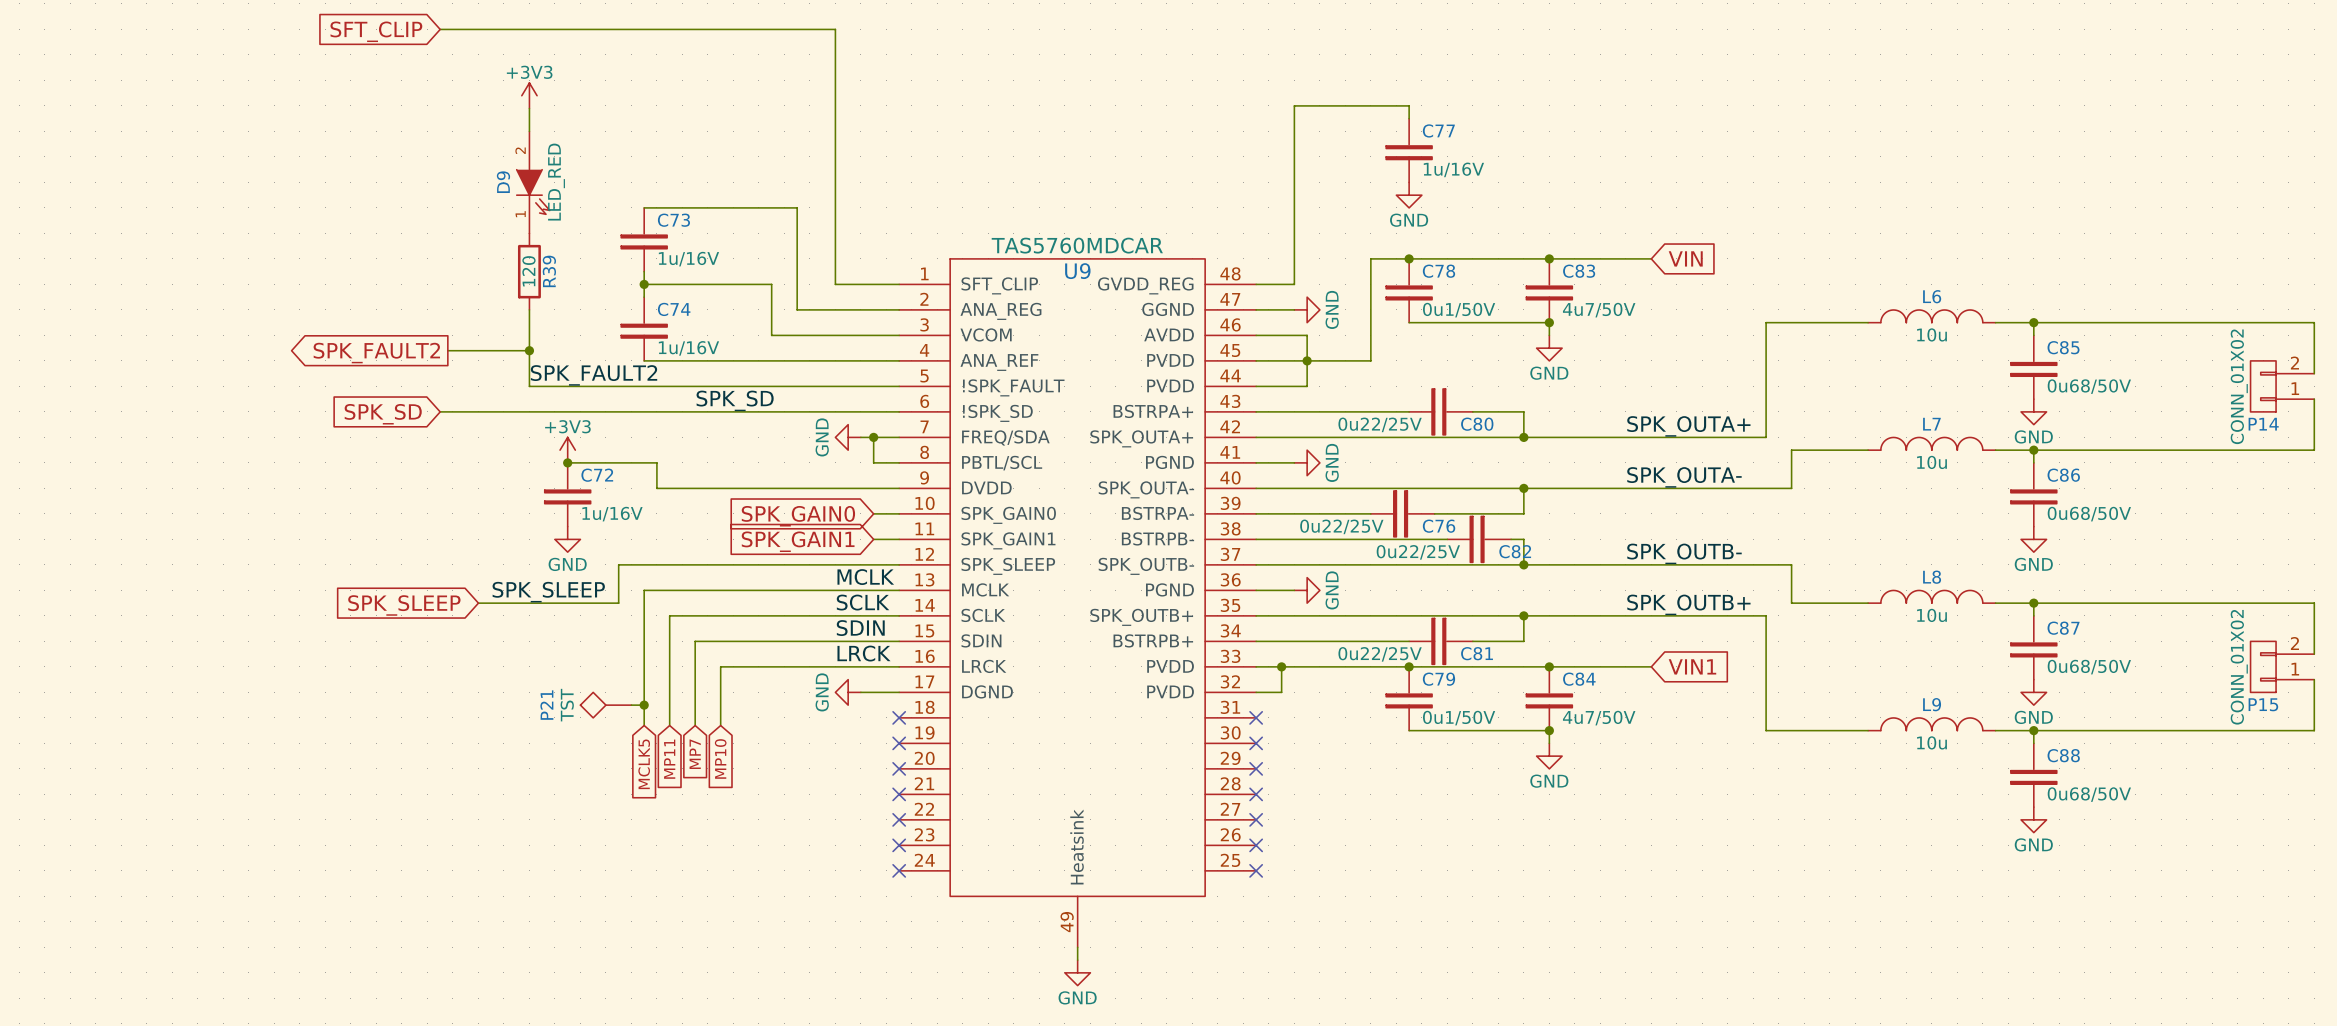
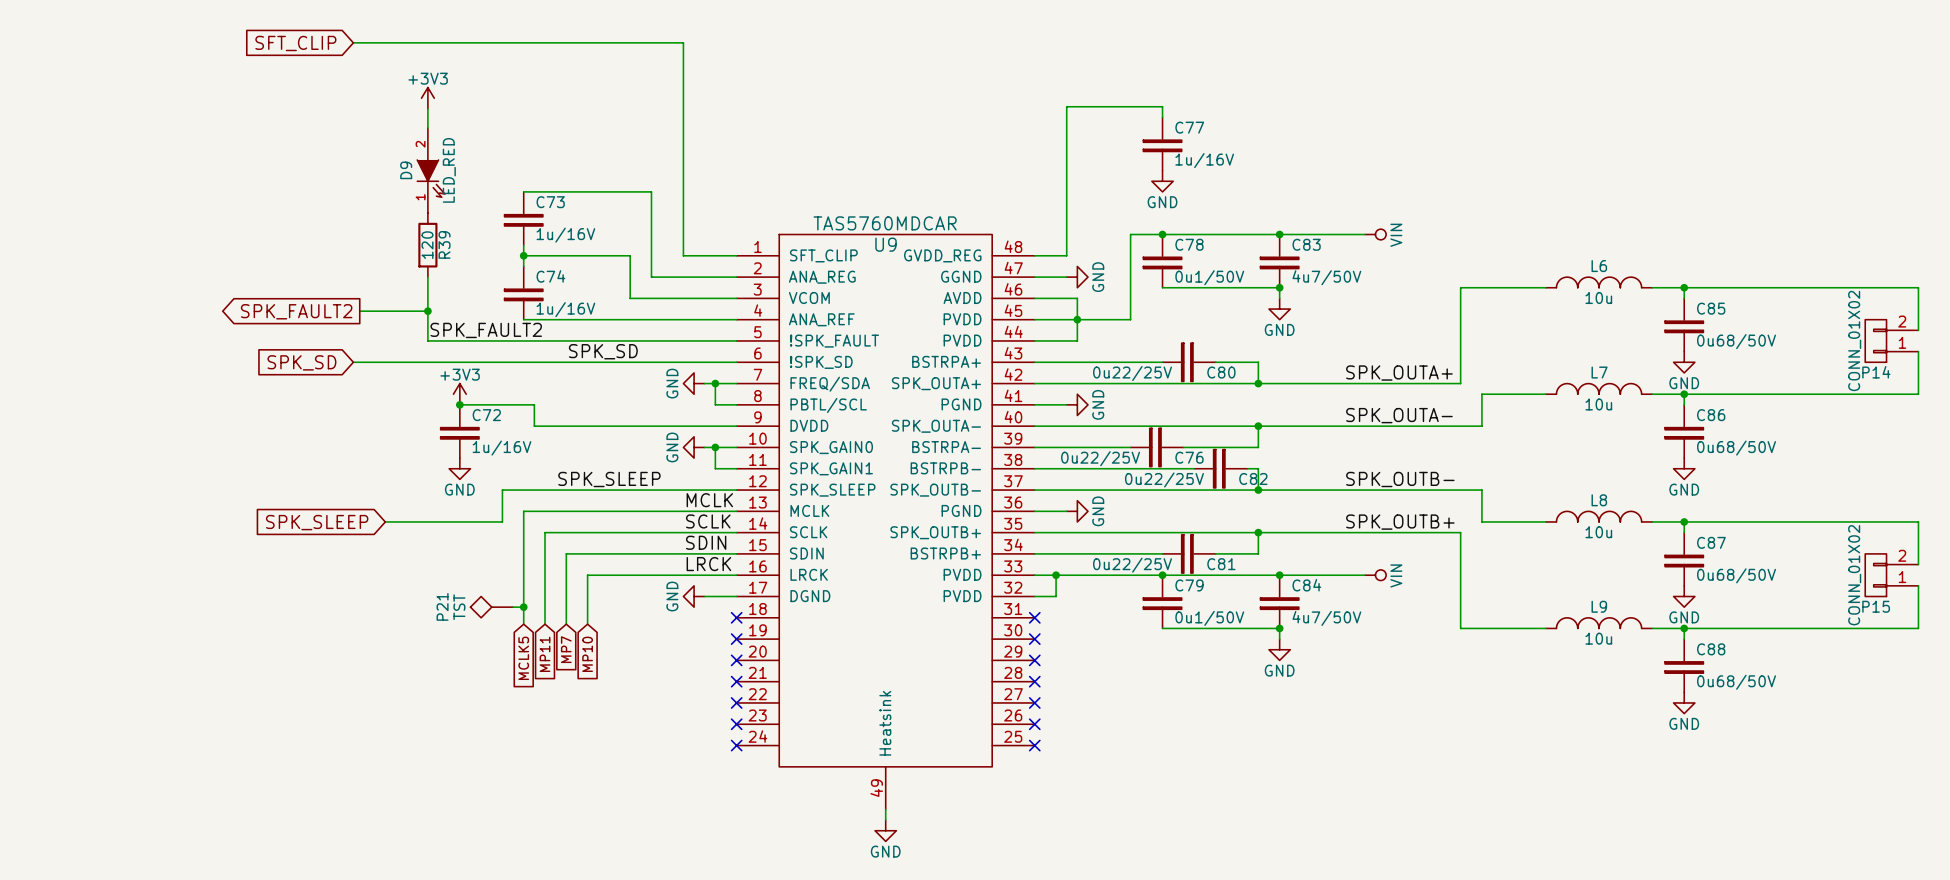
power symbol: none -> VIN (1375, 234)
global label: VIN (1685, 258) -> none
power symbol: none -> GND (694, 447)
wire: none -> (704, 447) (715, 447) (715, 468)
junction: none -> (715, 447)
global label: SPK_GAIN0 (798, 516) -> none
global label: SPK_GAIN1 (798, 541) -> none
label position: SPK_SLEEP (548, 592) -> SPK_SLEEP (609, 479)
power symbol: none -> VIN (1375, 575)
global label: VIN1 (1692, 666) -> none

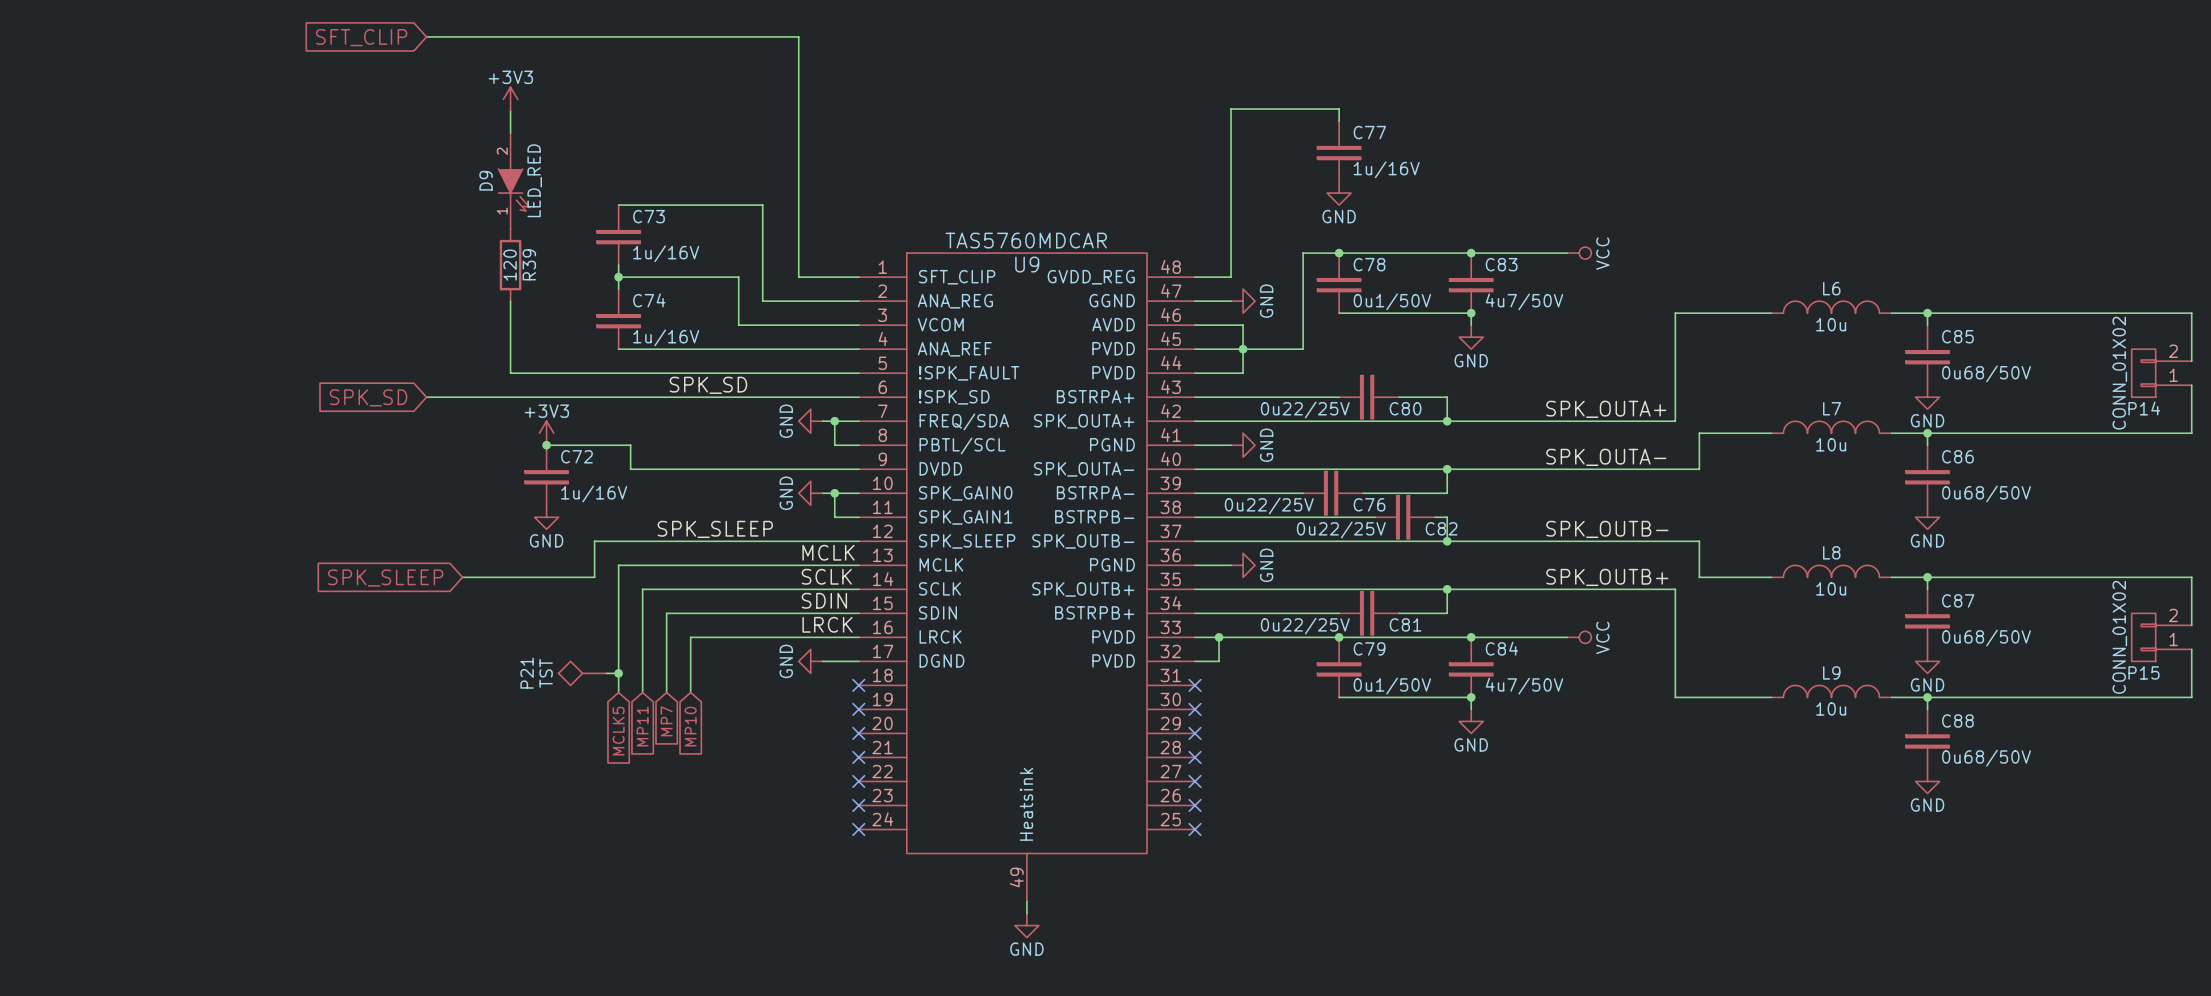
power symbol: VIN (1375, 234) -> VCC (1579, 253)
global label: SPK_FAULT2 (296, 311) -> none
wire: (359, 311) (427, 311) -> none
junction: (427, 311) -> none
label: SPK_FAULT2 (486, 330) -> none
power symbol: VIN (1375, 575) -> VCC (1579, 637)

